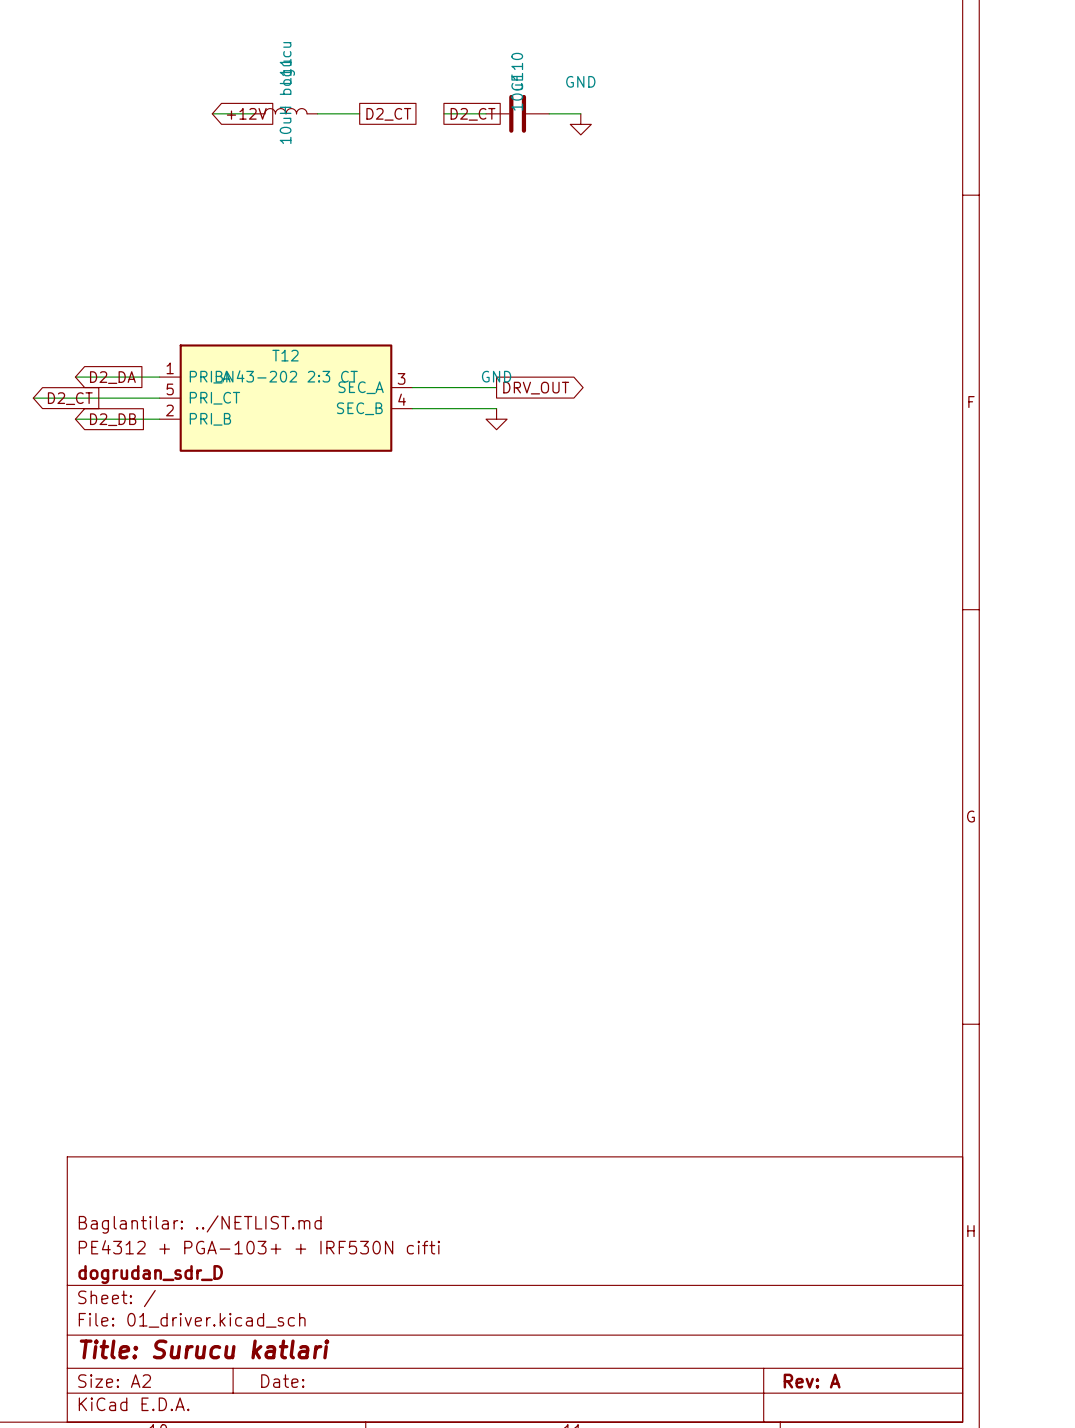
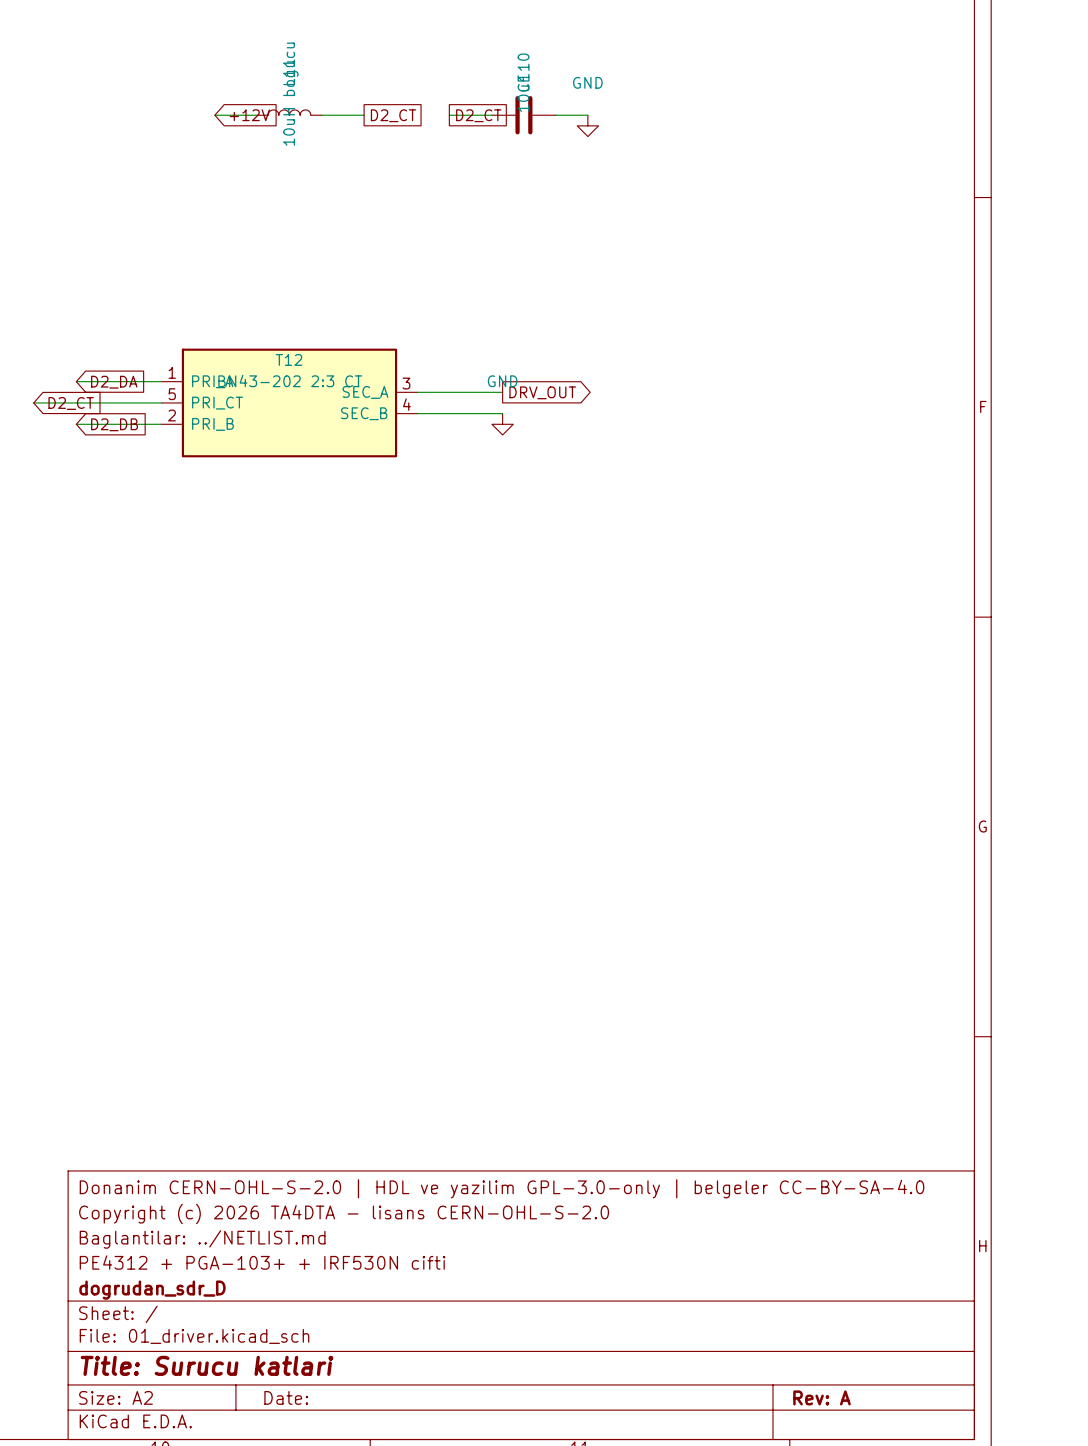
title block: none -> Donanim CERN-OHL-S-2.0 | HDL ve yazilim GPL-3.0-only | belgeler CC-BY-SA-4.0 (502, 1188)
title block: none -> Copyright (c) 2026 TA4DTA - lisans CERN-OHL-S-2.0 (344, 1213)

